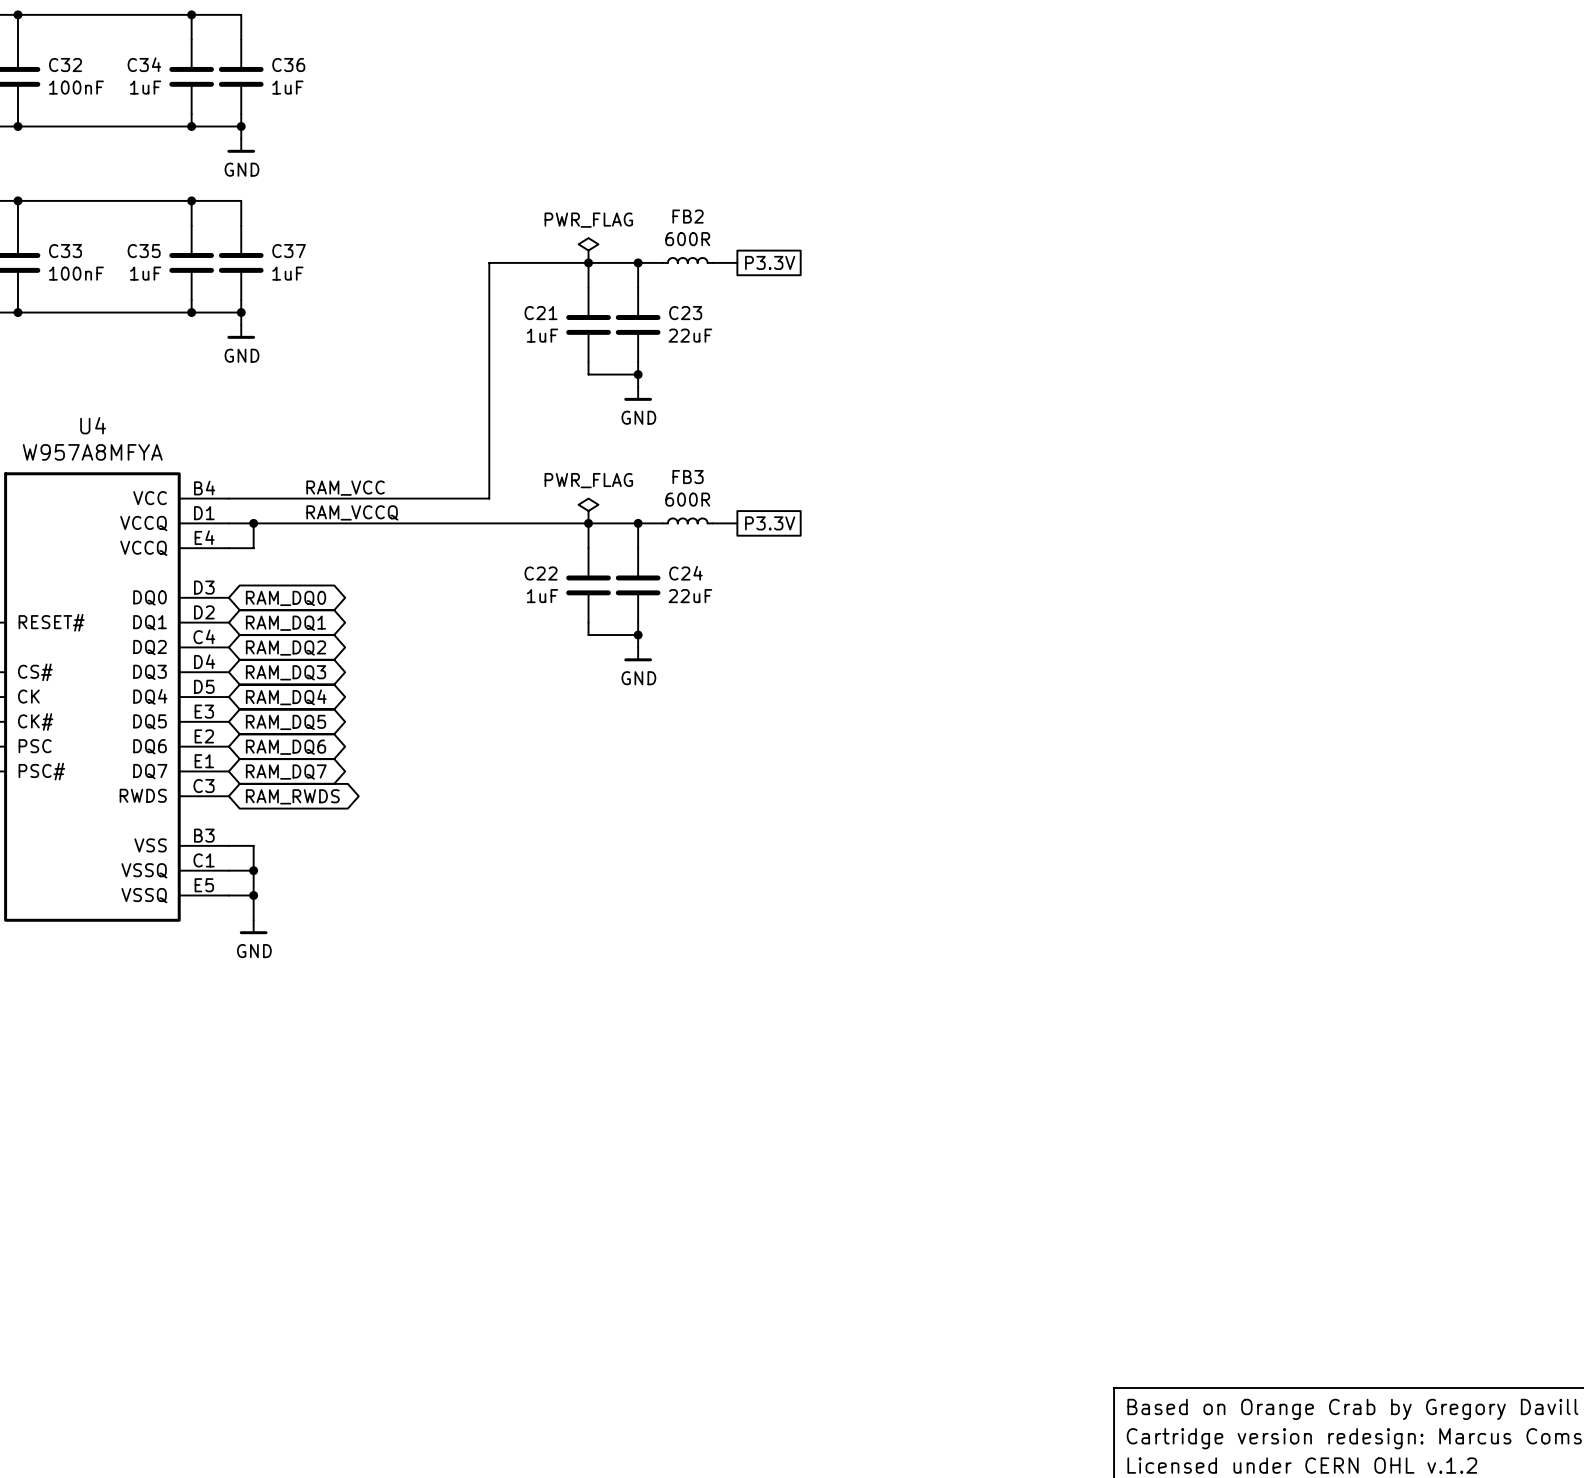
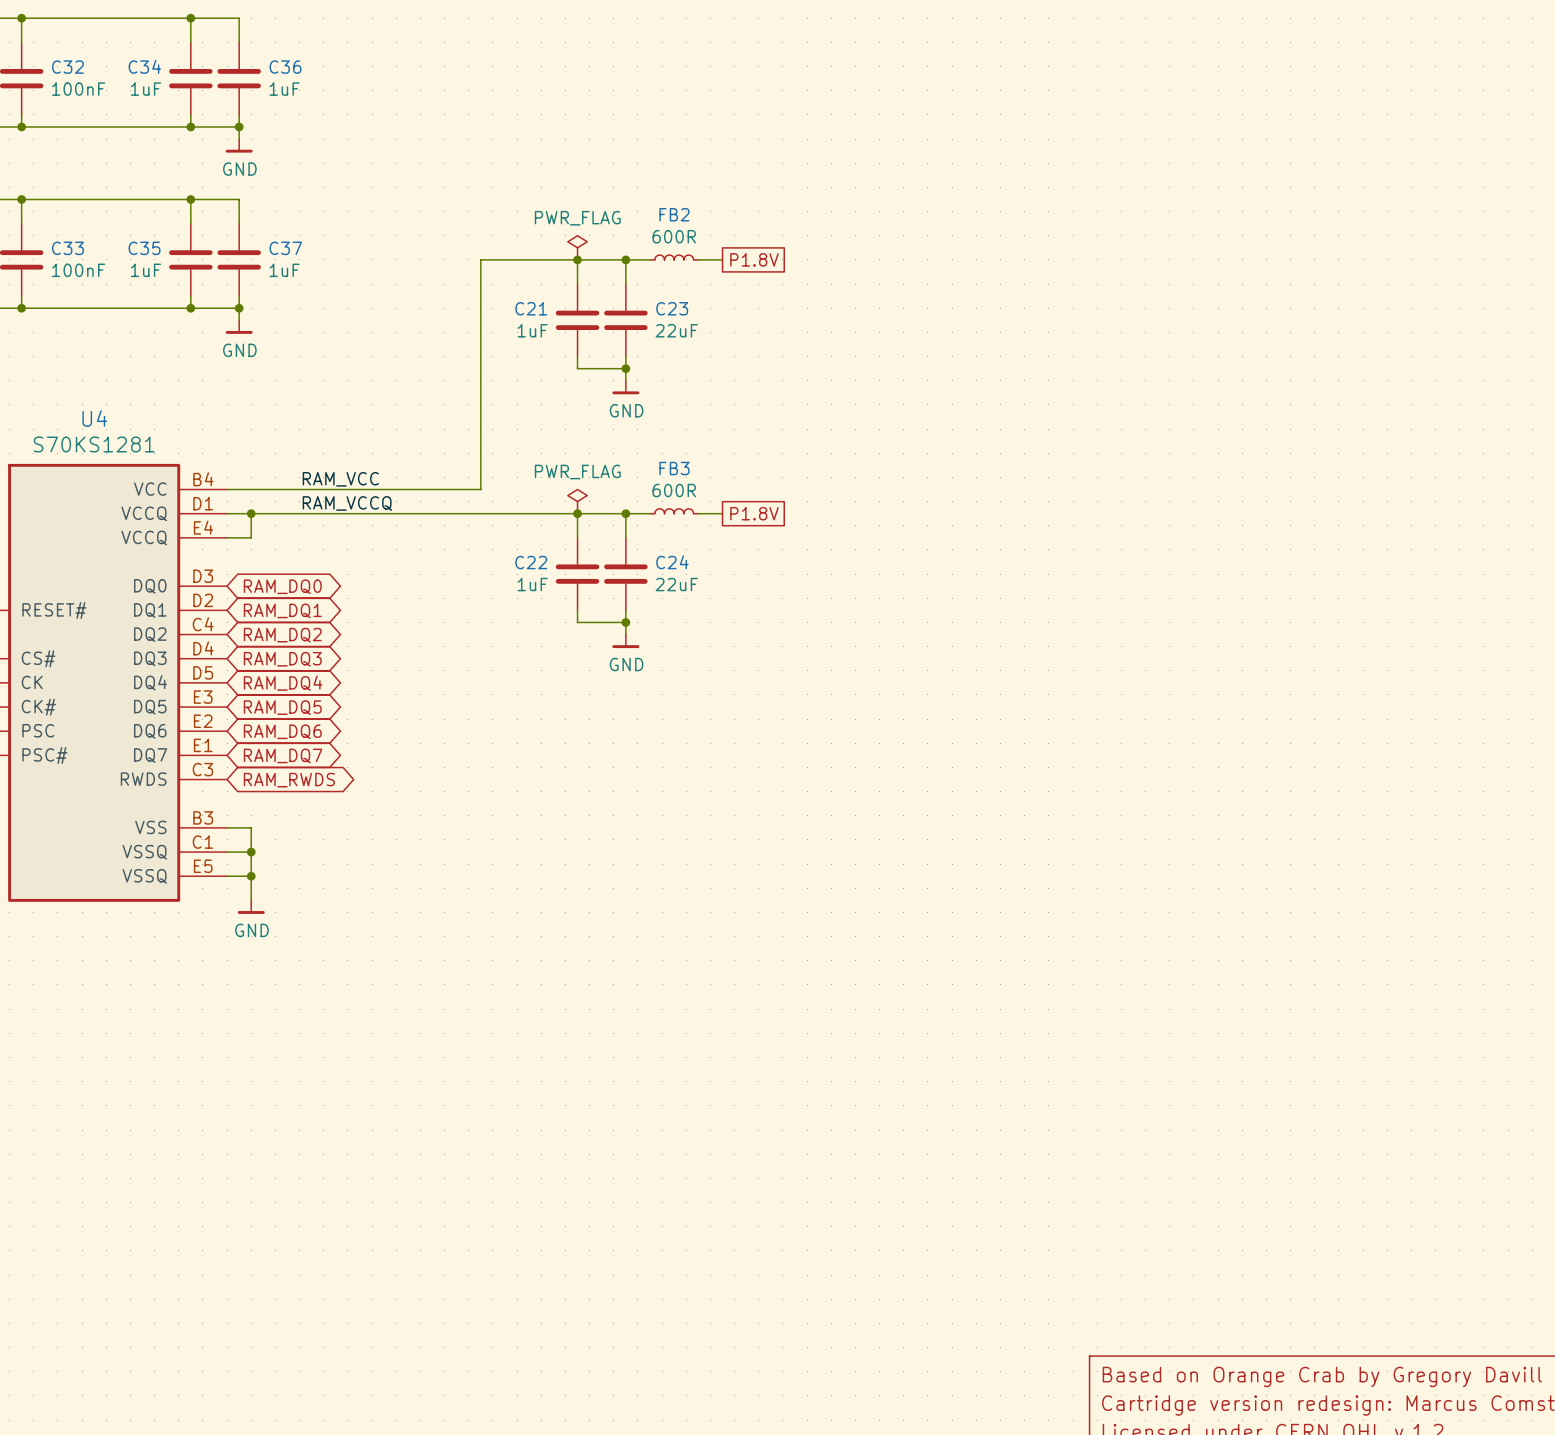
global label: P3.3V (770, 262) -> P1.8V (754, 259)
U4 value: W957A8MFYA (92, 452) -> S70KS1281 (94, 444)
global label: P3.3V (770, 523) -> P1.8V (754, 513)

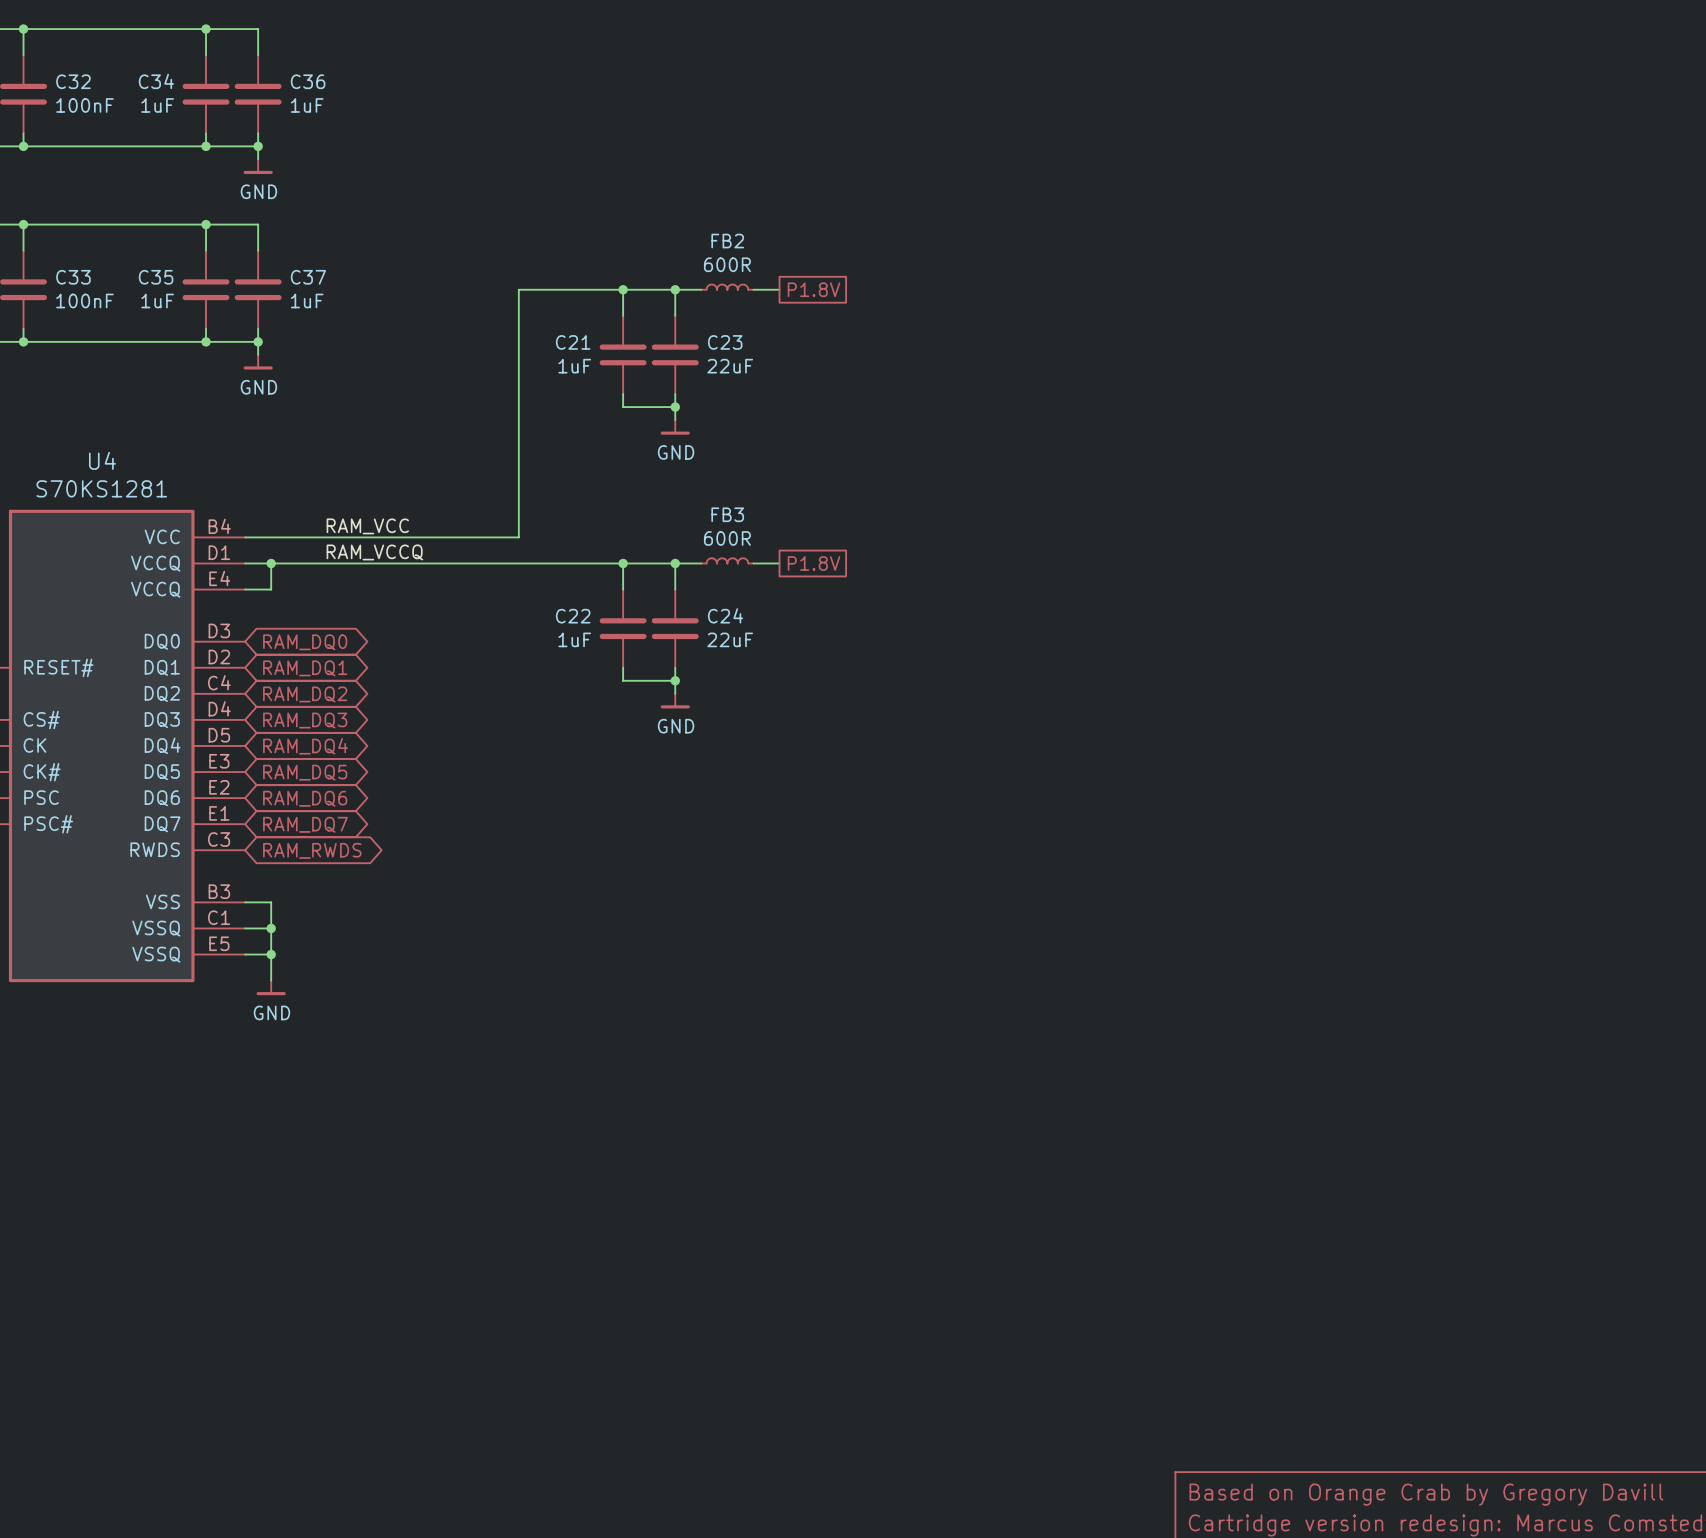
power symbol: PWR_FLAG (577, 247) -> none
power symbol: PWR_FLAG (577, 501) -> none

